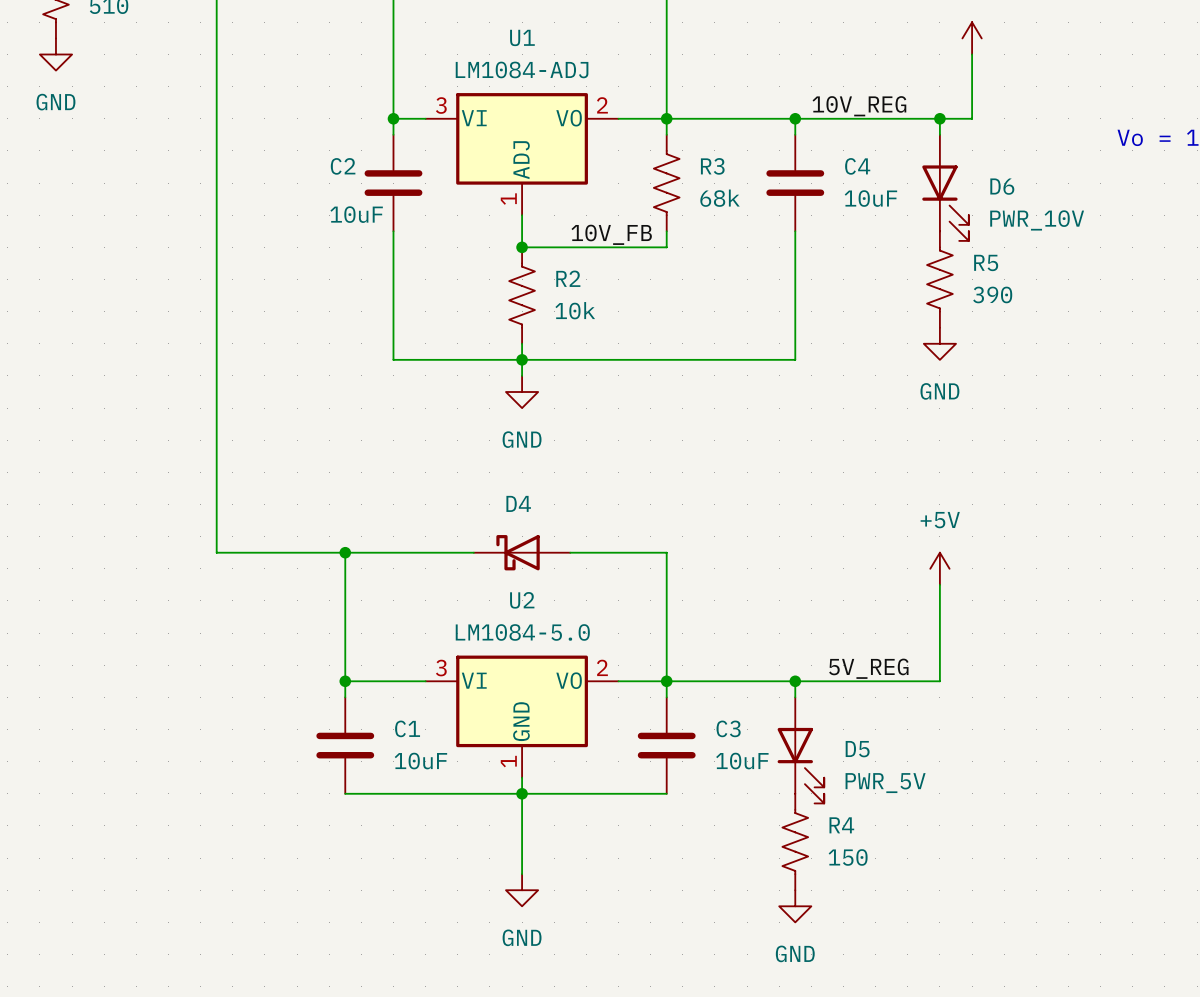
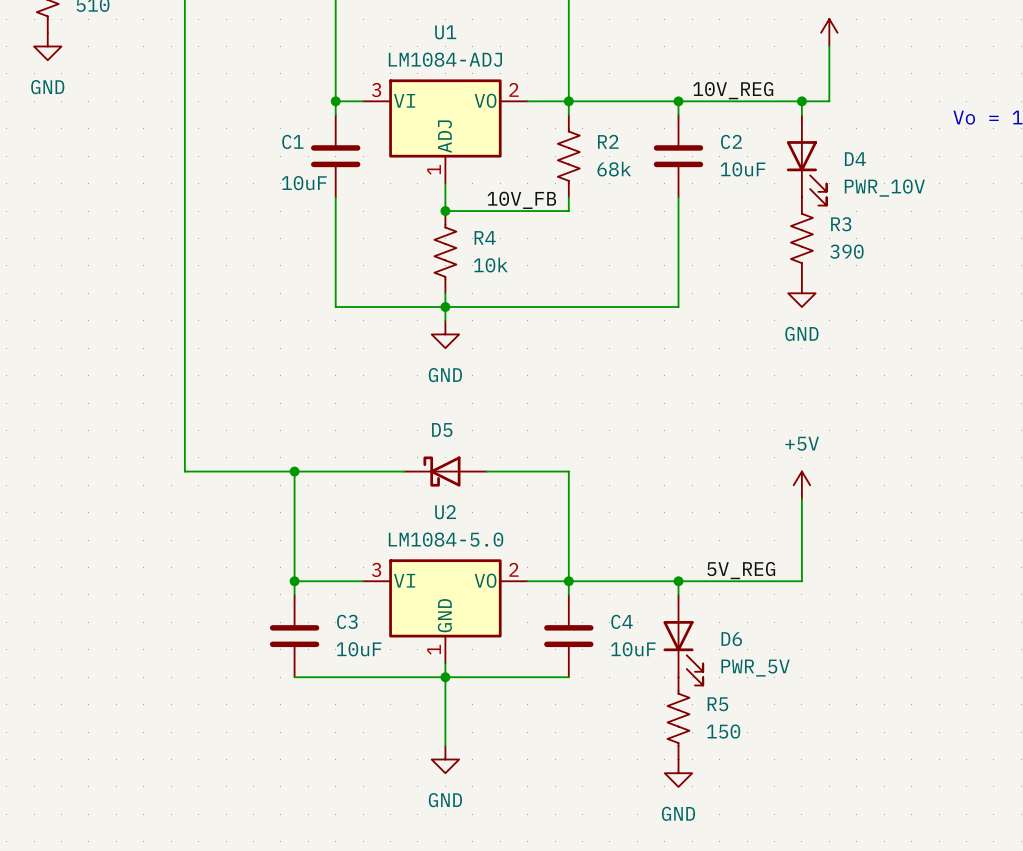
C2 name: C2 (343, 166) -> C1 (292, 141)
R3 name: R3 (712, 166) -> R2 (608, 141)
C4 name: C4 (857, 166) -> C2 (731, 141)
D6 name: D6 (1002, 186) -> D4 (855, 159)
R5 name: R5 (986, 262) -> R3 (841, 224)
R2 name: R2 (568, 278) -> R4 (485, 237)
D4 name: D4 (518, 503) -> D5 (442, 430)
C1 name: C1 (407, 728) -> C3 (347, 621)
C3 name: C3 (728, 728) -> C4 (622, 621)
D5 name: D5 (857, 749) -> D6 (731, 639)
R4 name: R4 (841, 825) -> R5 (717, 704)

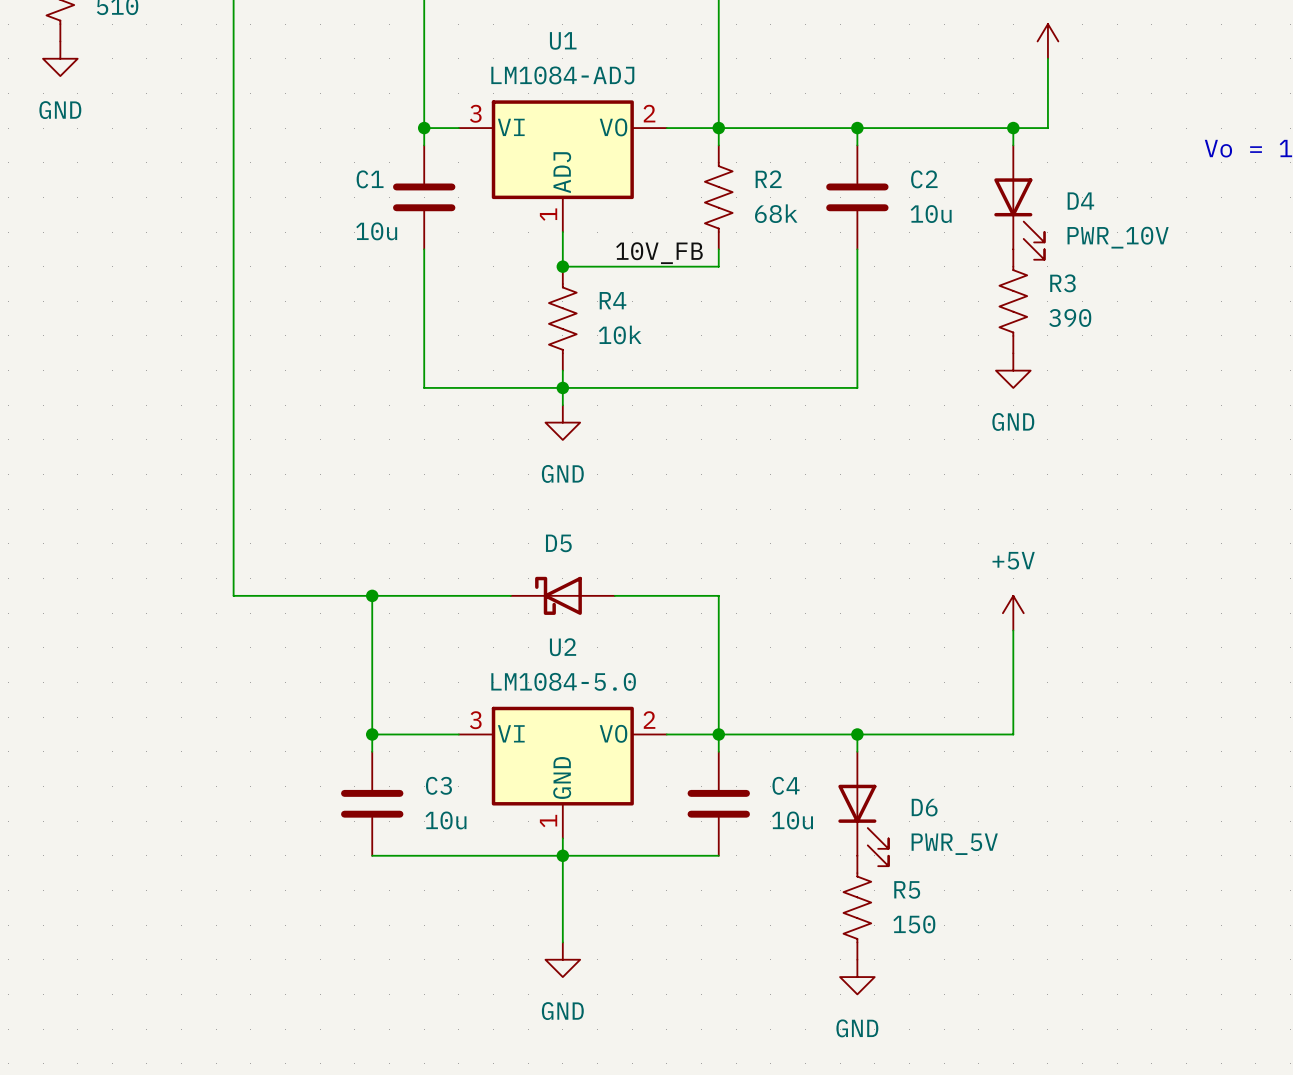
label: 10V_REG (733, 90) -> none
C2 value: 10uF (743, 169) -> 10u (931, 214)
C1 value: 10uF (304, 183) -> 10u (376, 231)
label: 5V_REG (741, 570) -> none
C3 value: 10uF (359, 649) -> 10u (445, 820)
C4 value: 10uF (633, 649) -> 10u (792, 820)

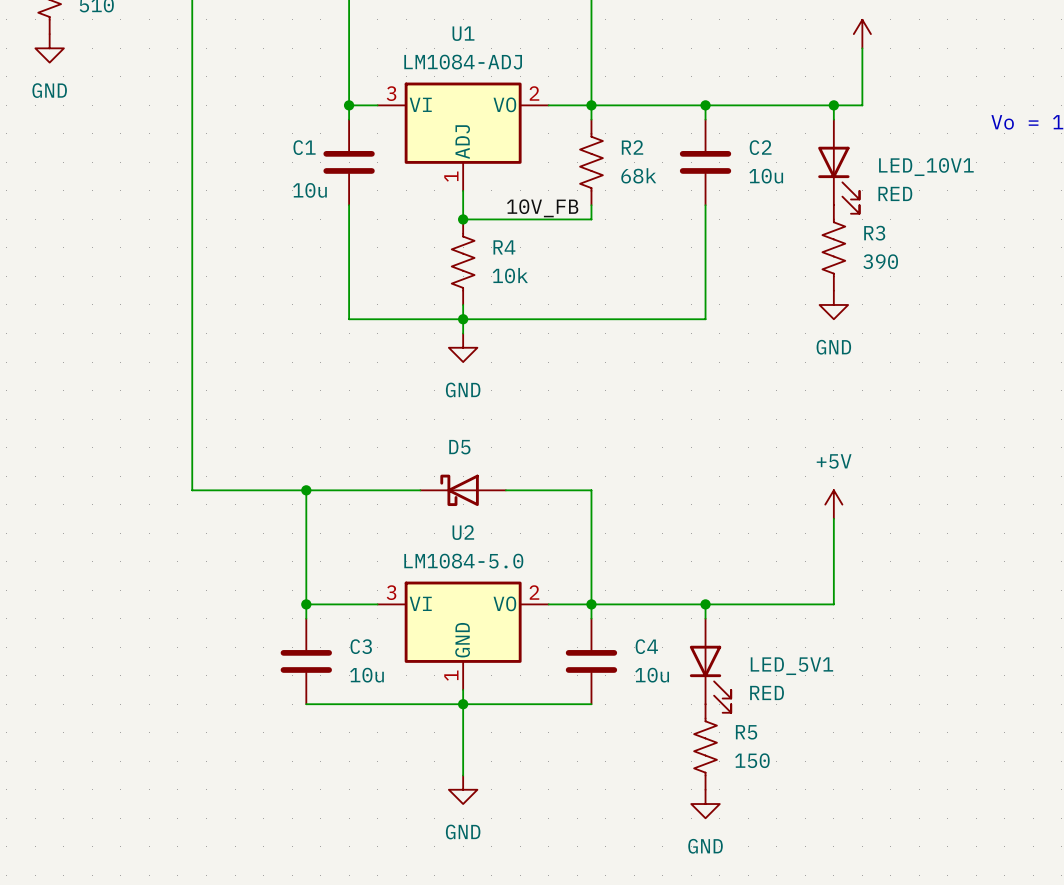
D4 name: D4 (1080, 201) -> LED_10V1 (926, 167)
D4 value: PWR_10V (1118, 237) -> RED (895, 193)
D6 name: D6 (924, 807) -> LED_5V1 (791, 666)
D6 value: PWR_5V (954, 844) -> RED (767, 692)

